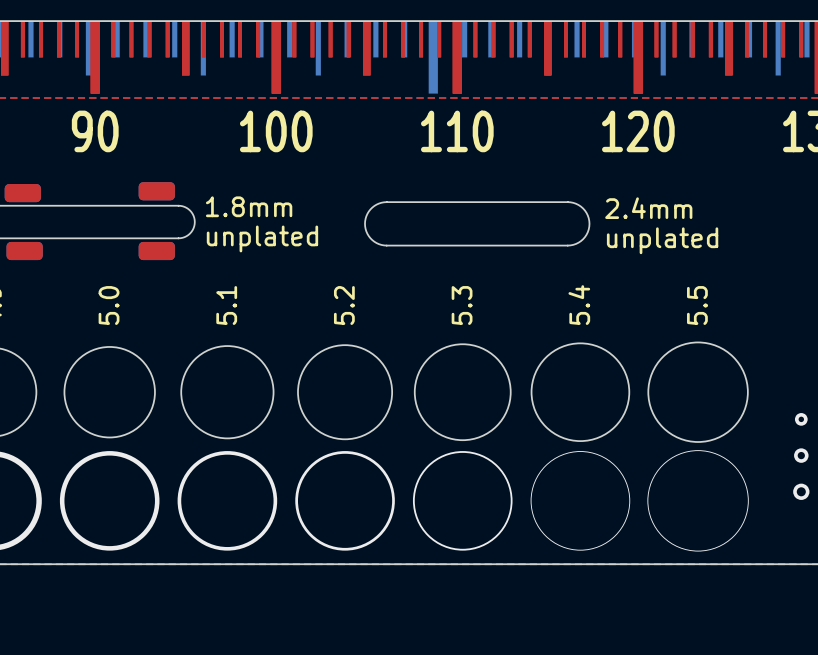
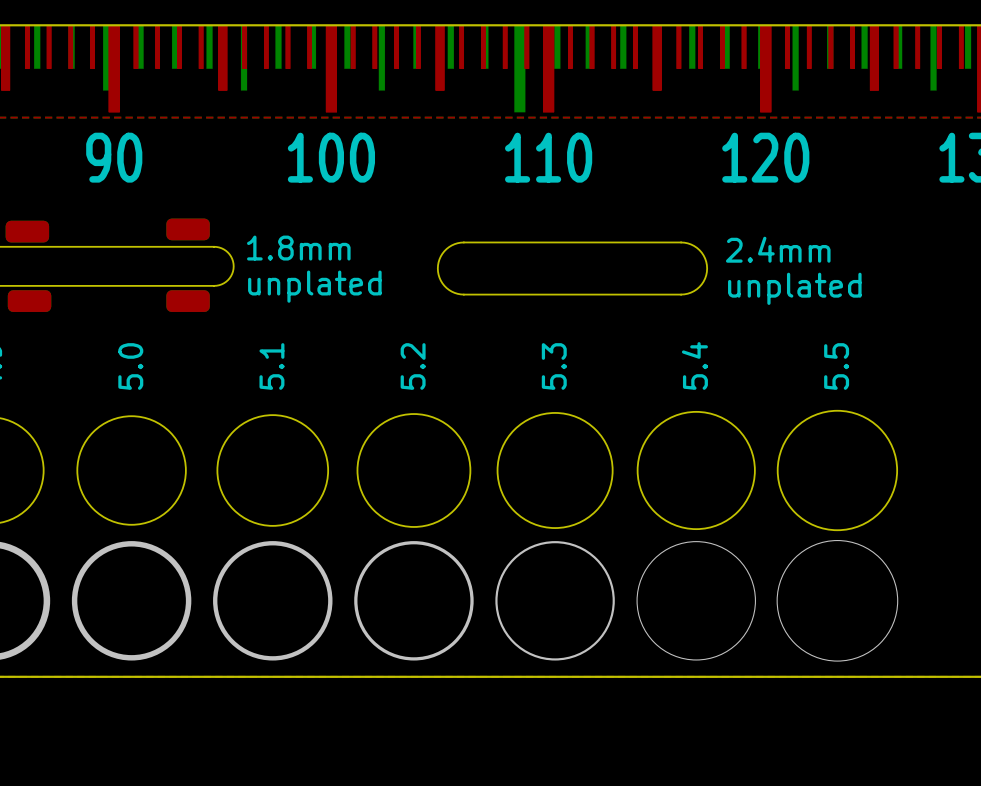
via: (801, 419) -> none
via: (801, 455) -> none
via: (801, 491) -> none

